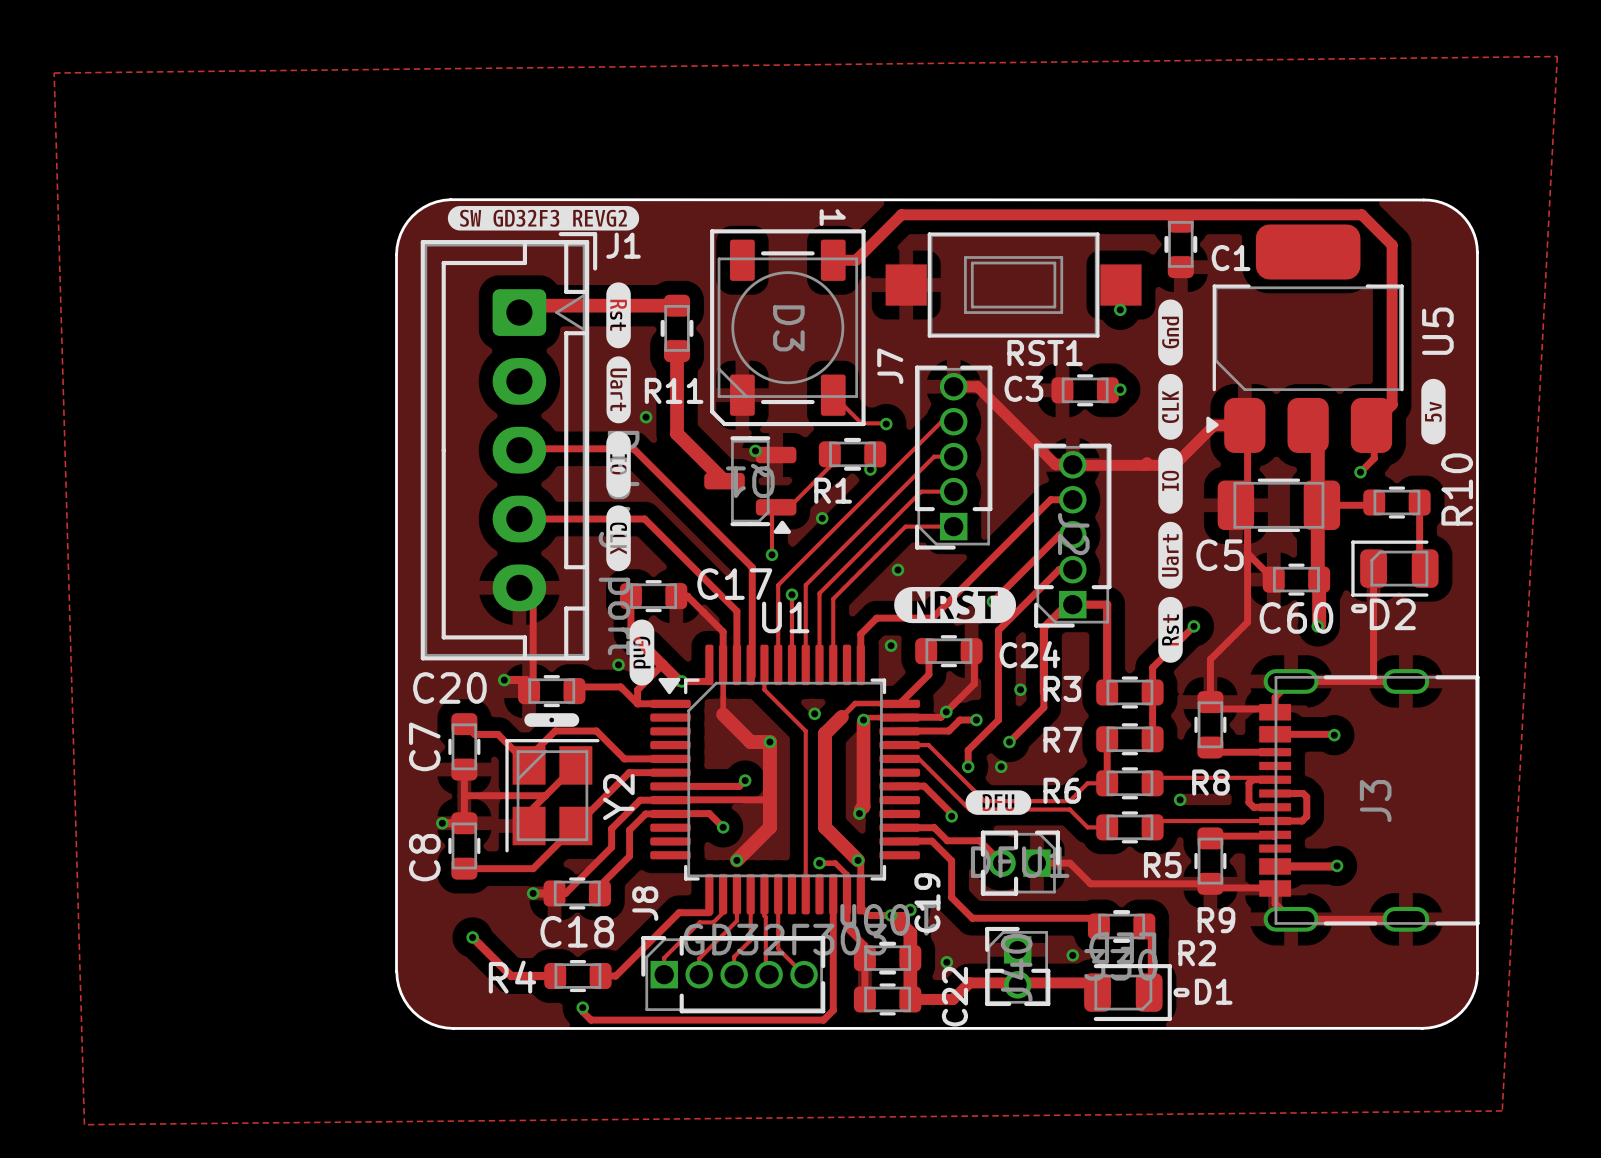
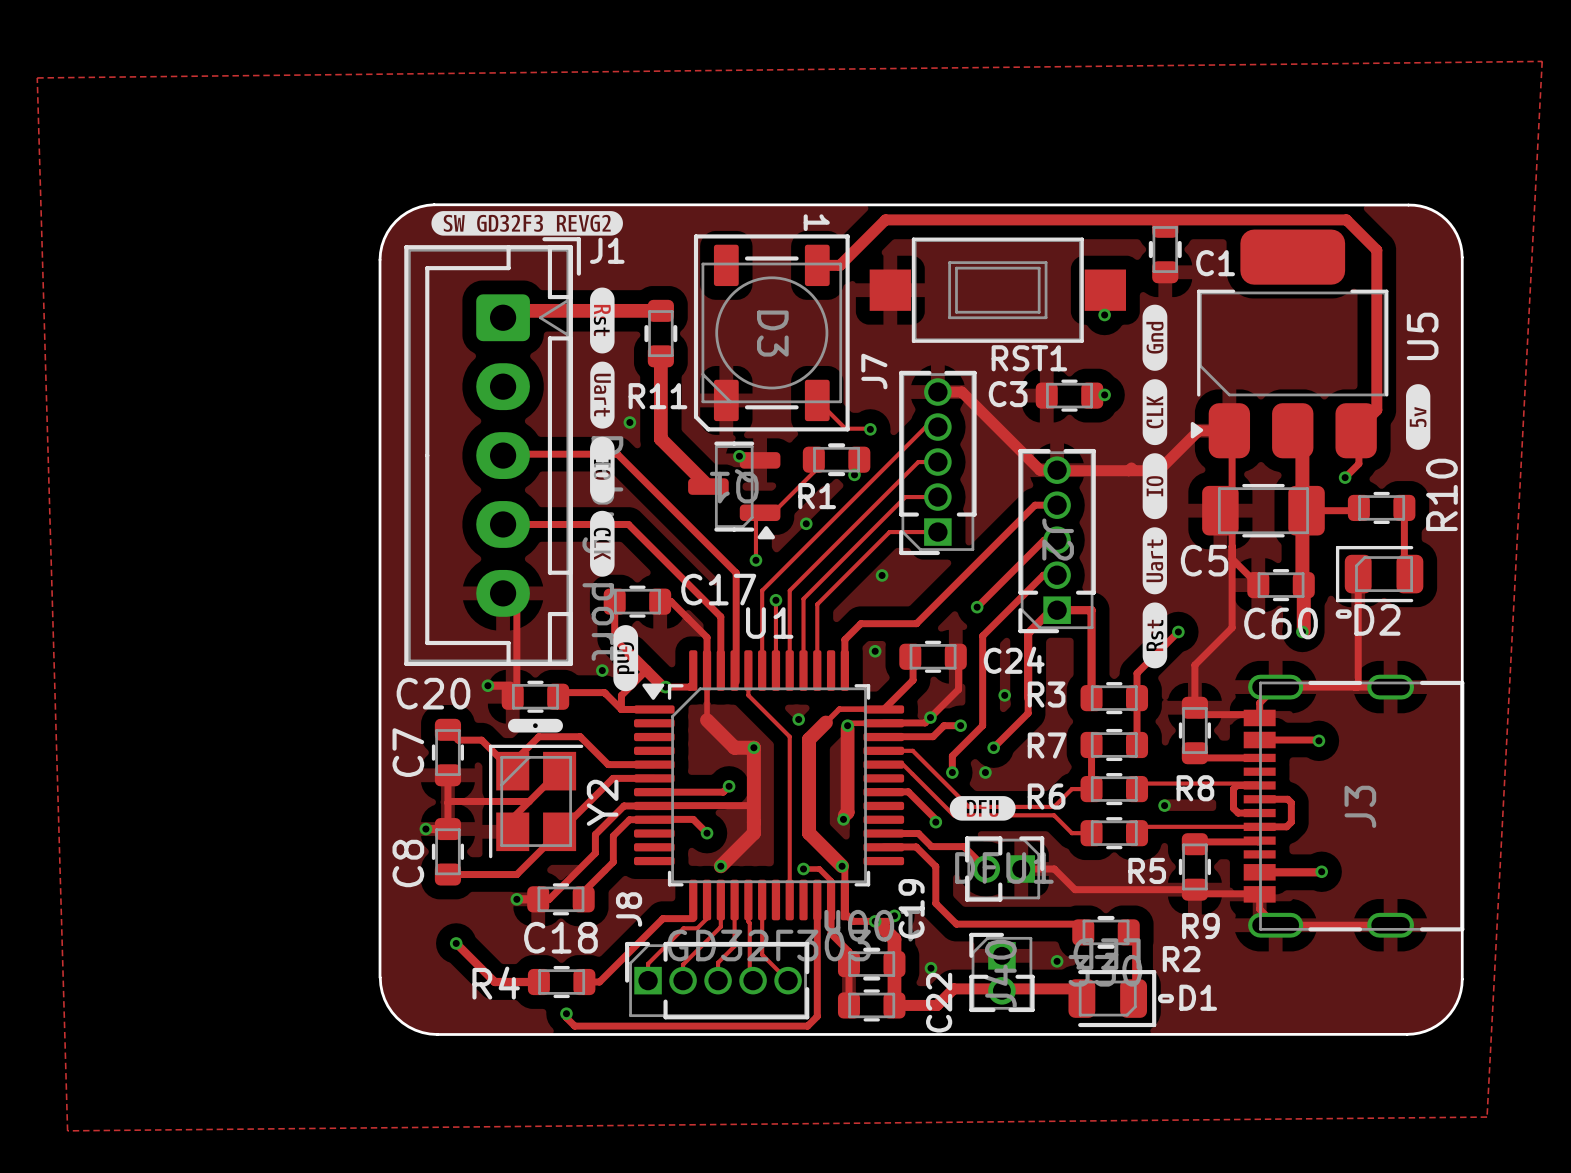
drawing: [894, 586, 1017, 624] -> none

